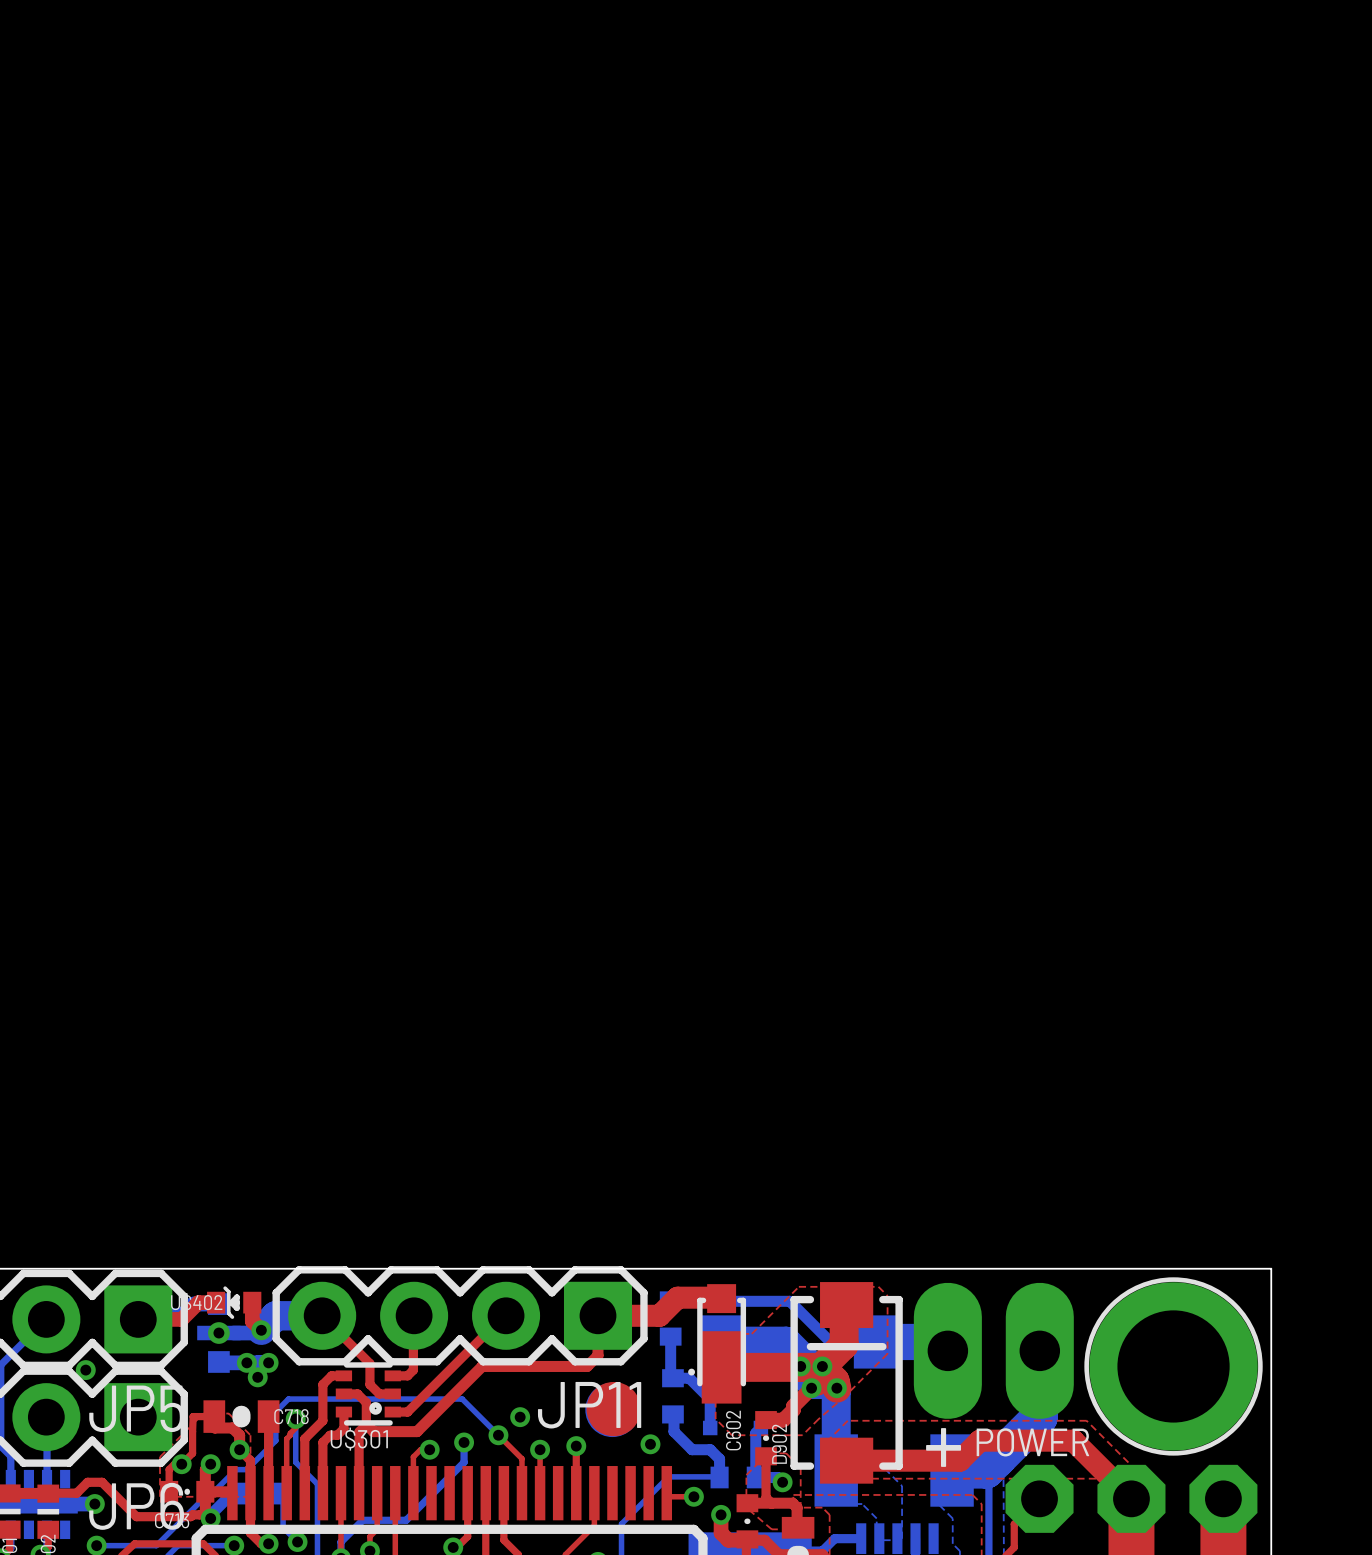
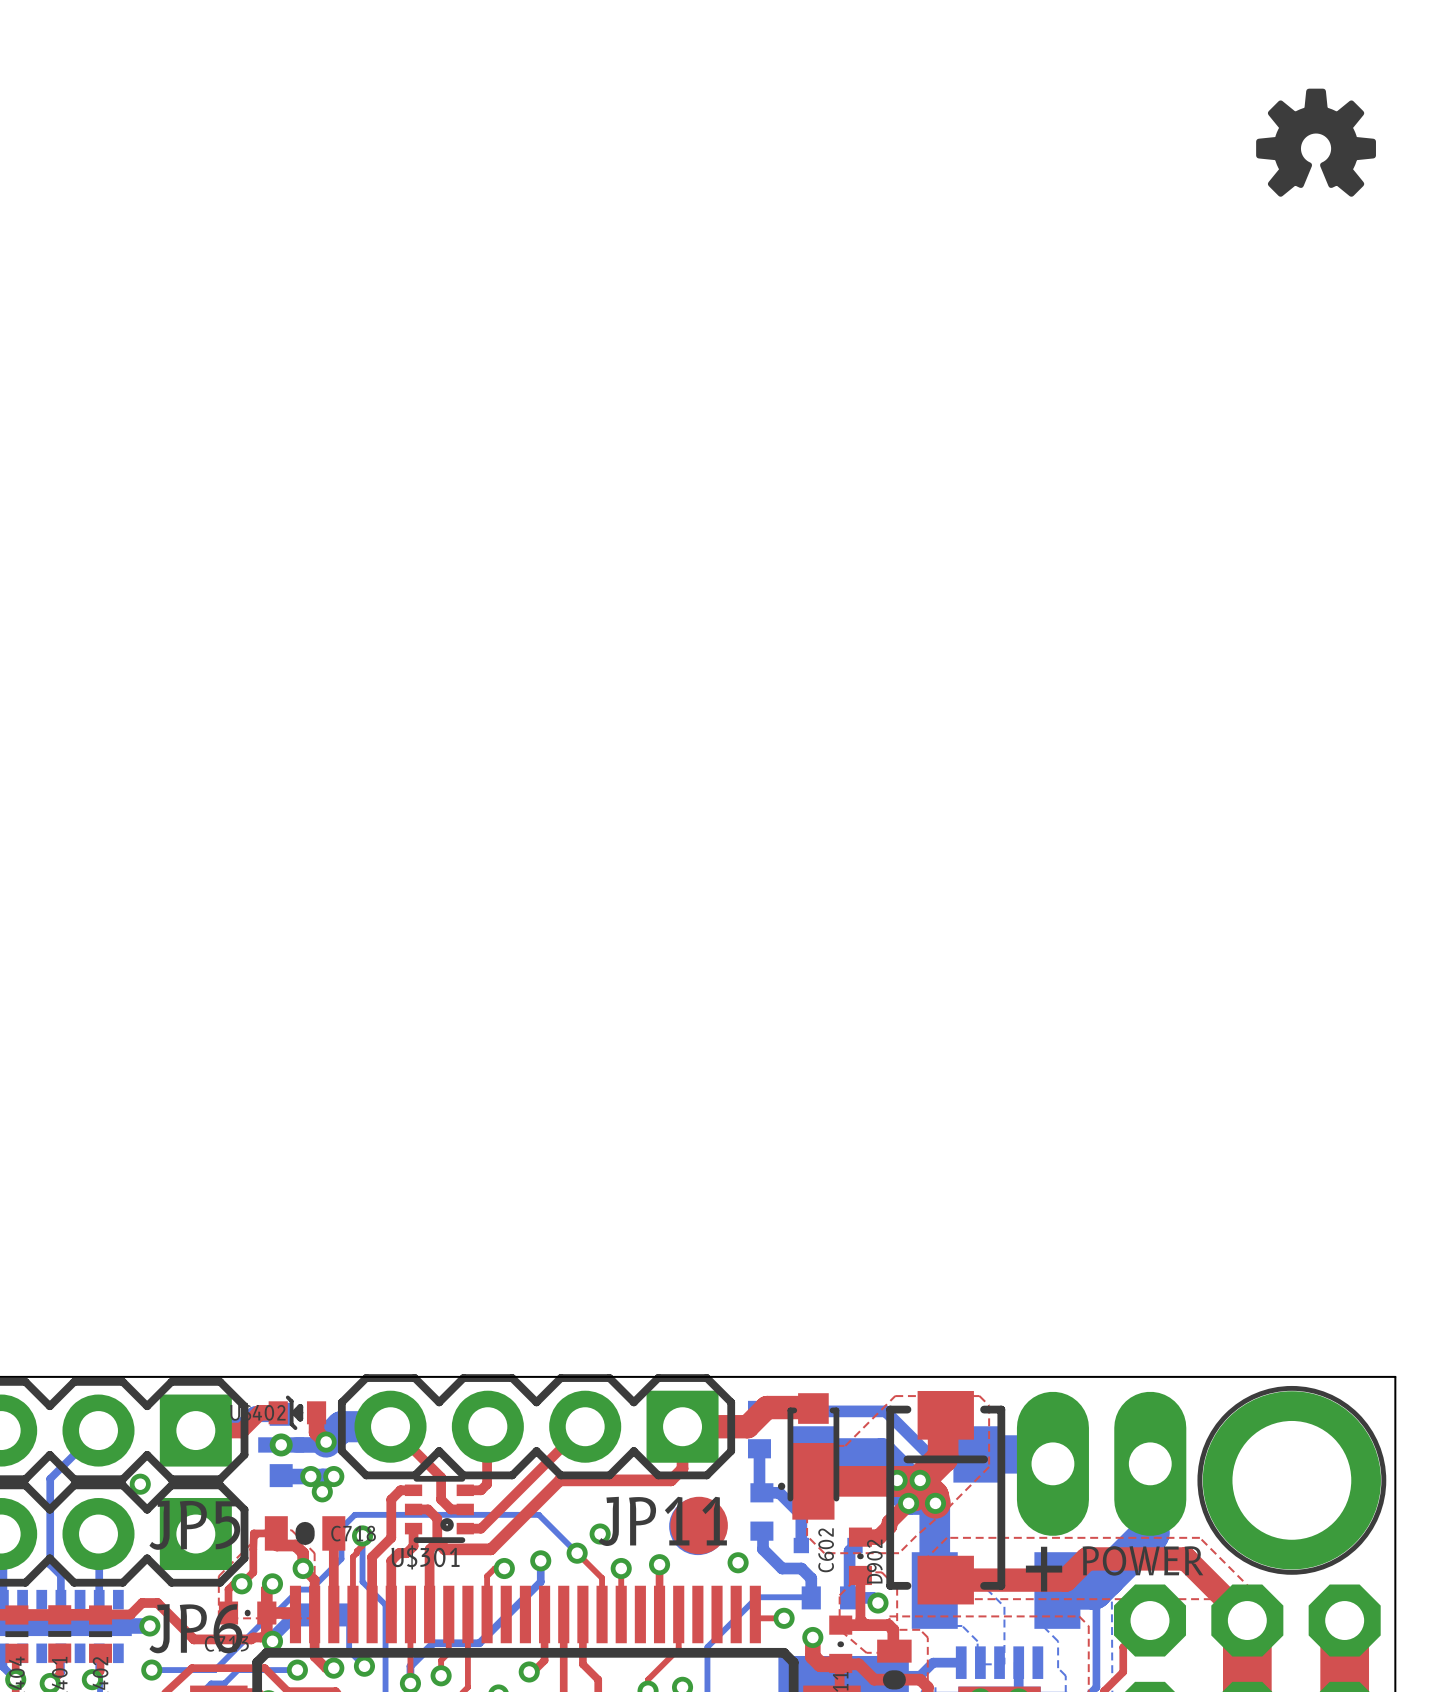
drawing: none -> [1256, 88, 1376, 197]

